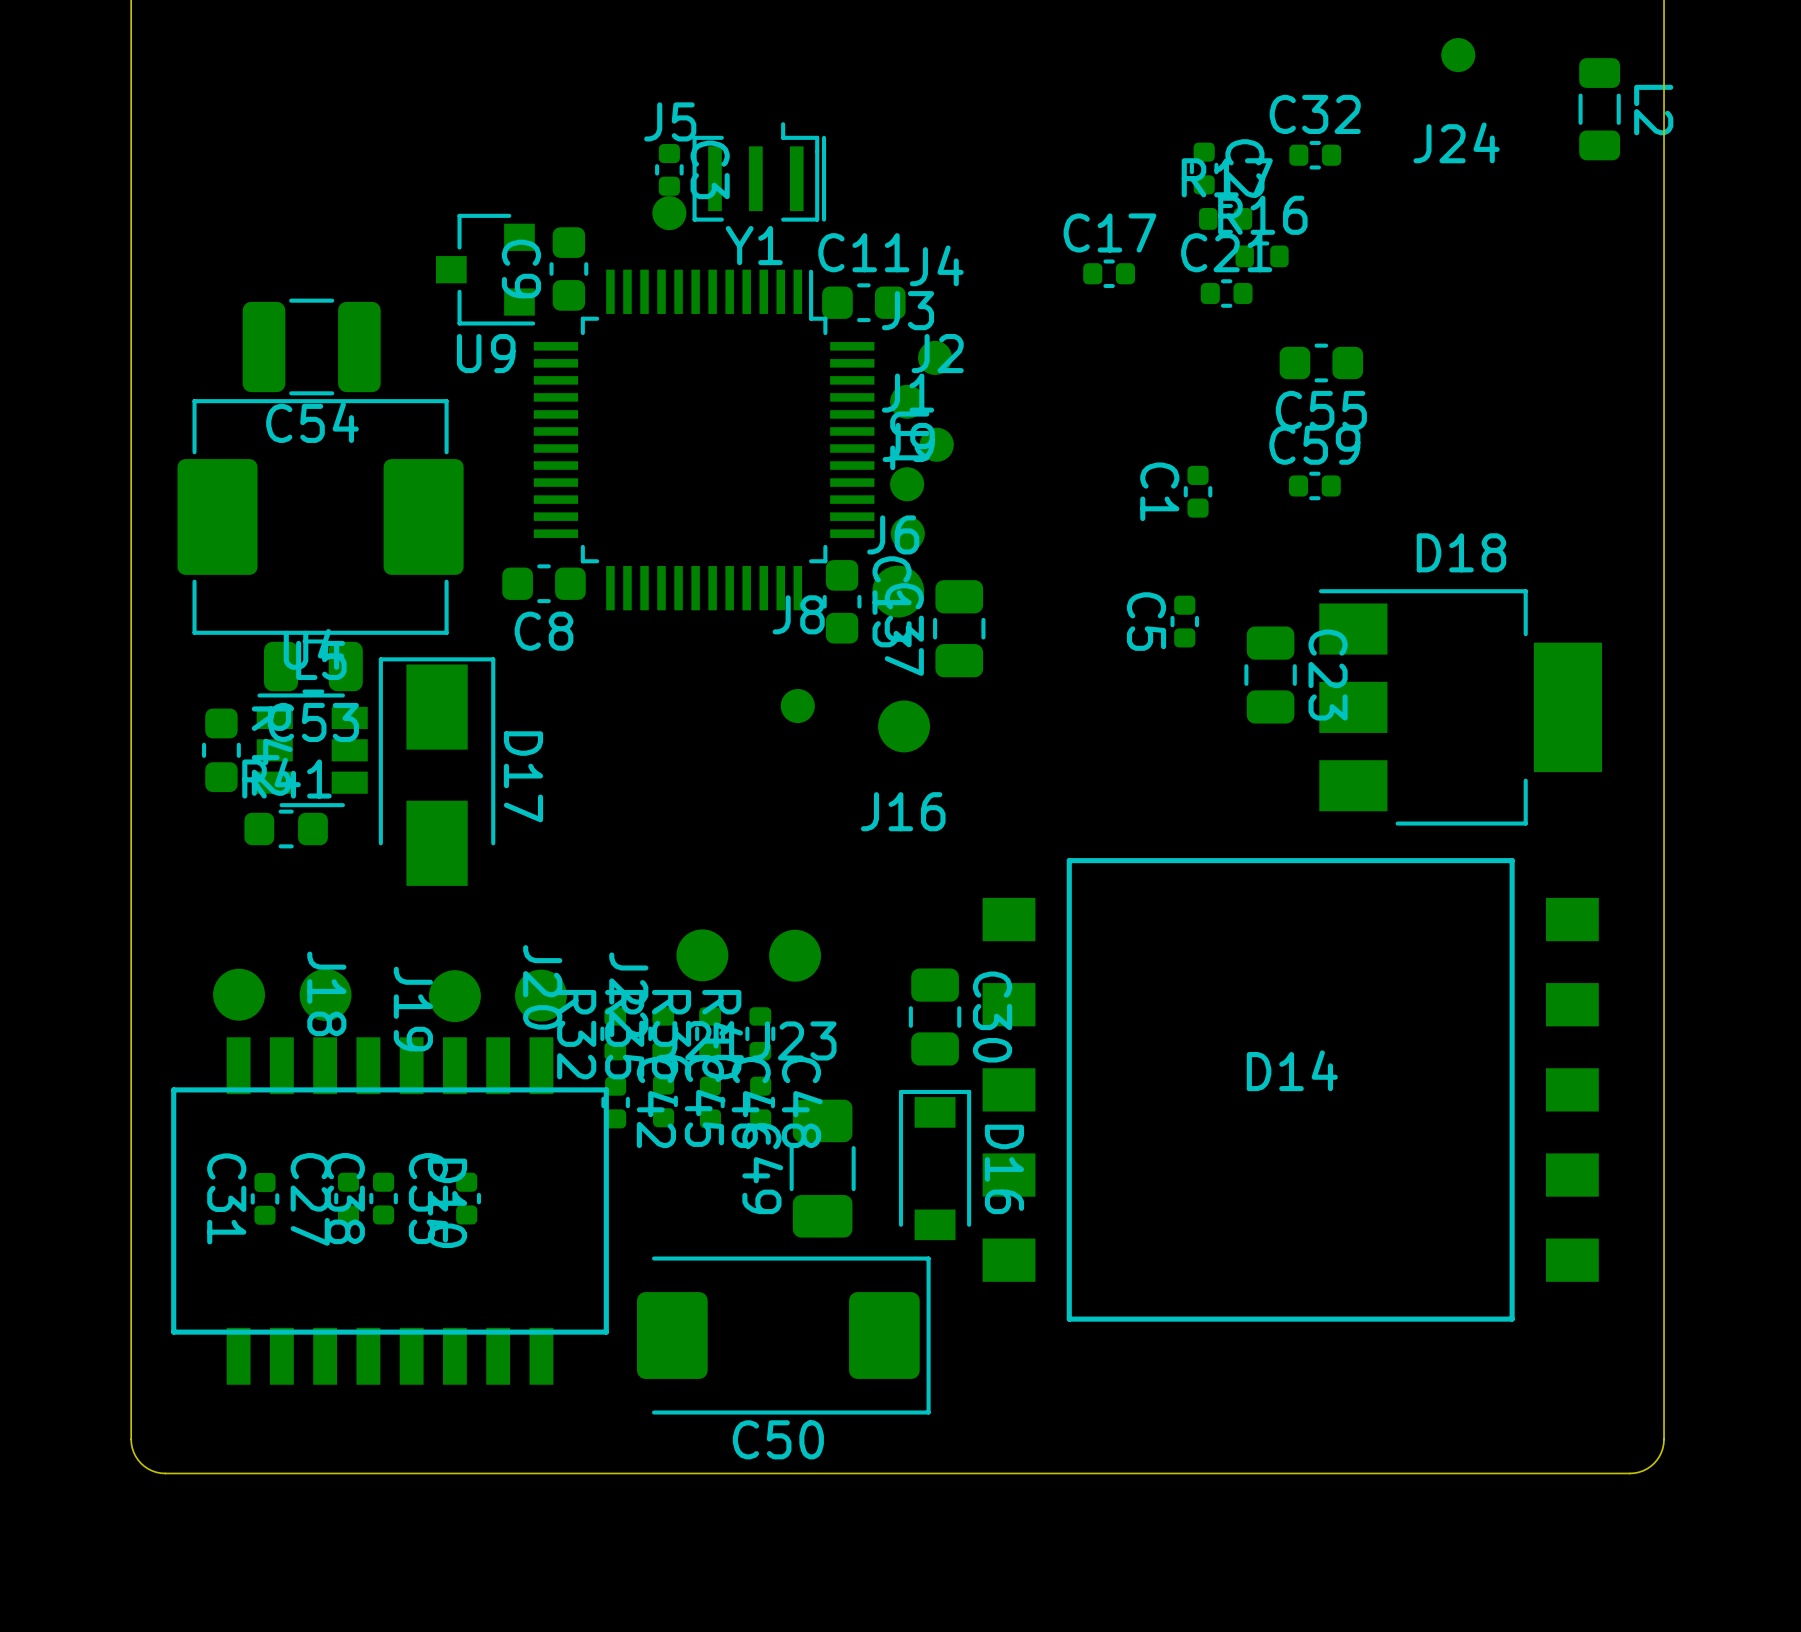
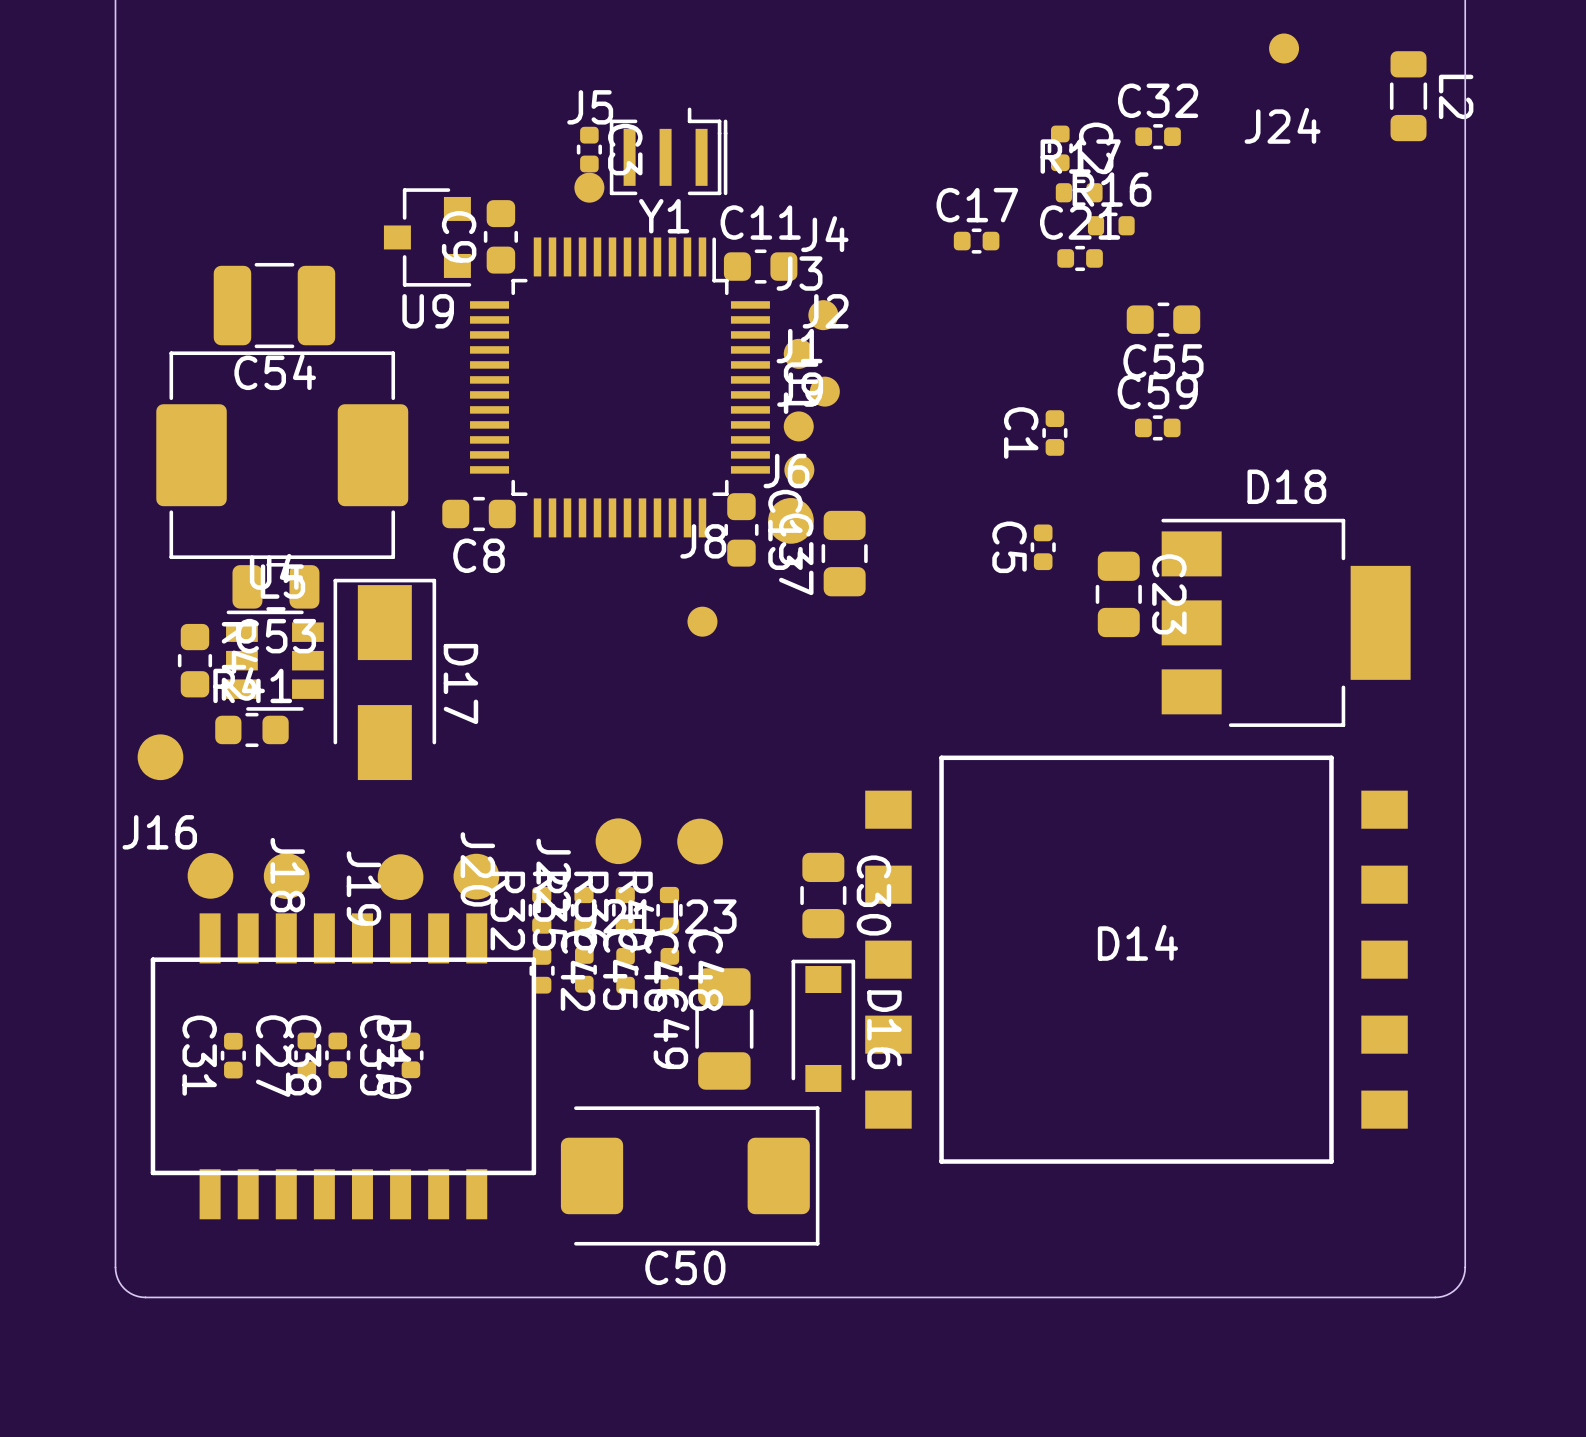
J16 position: (904, 726) -> (160, 757)

